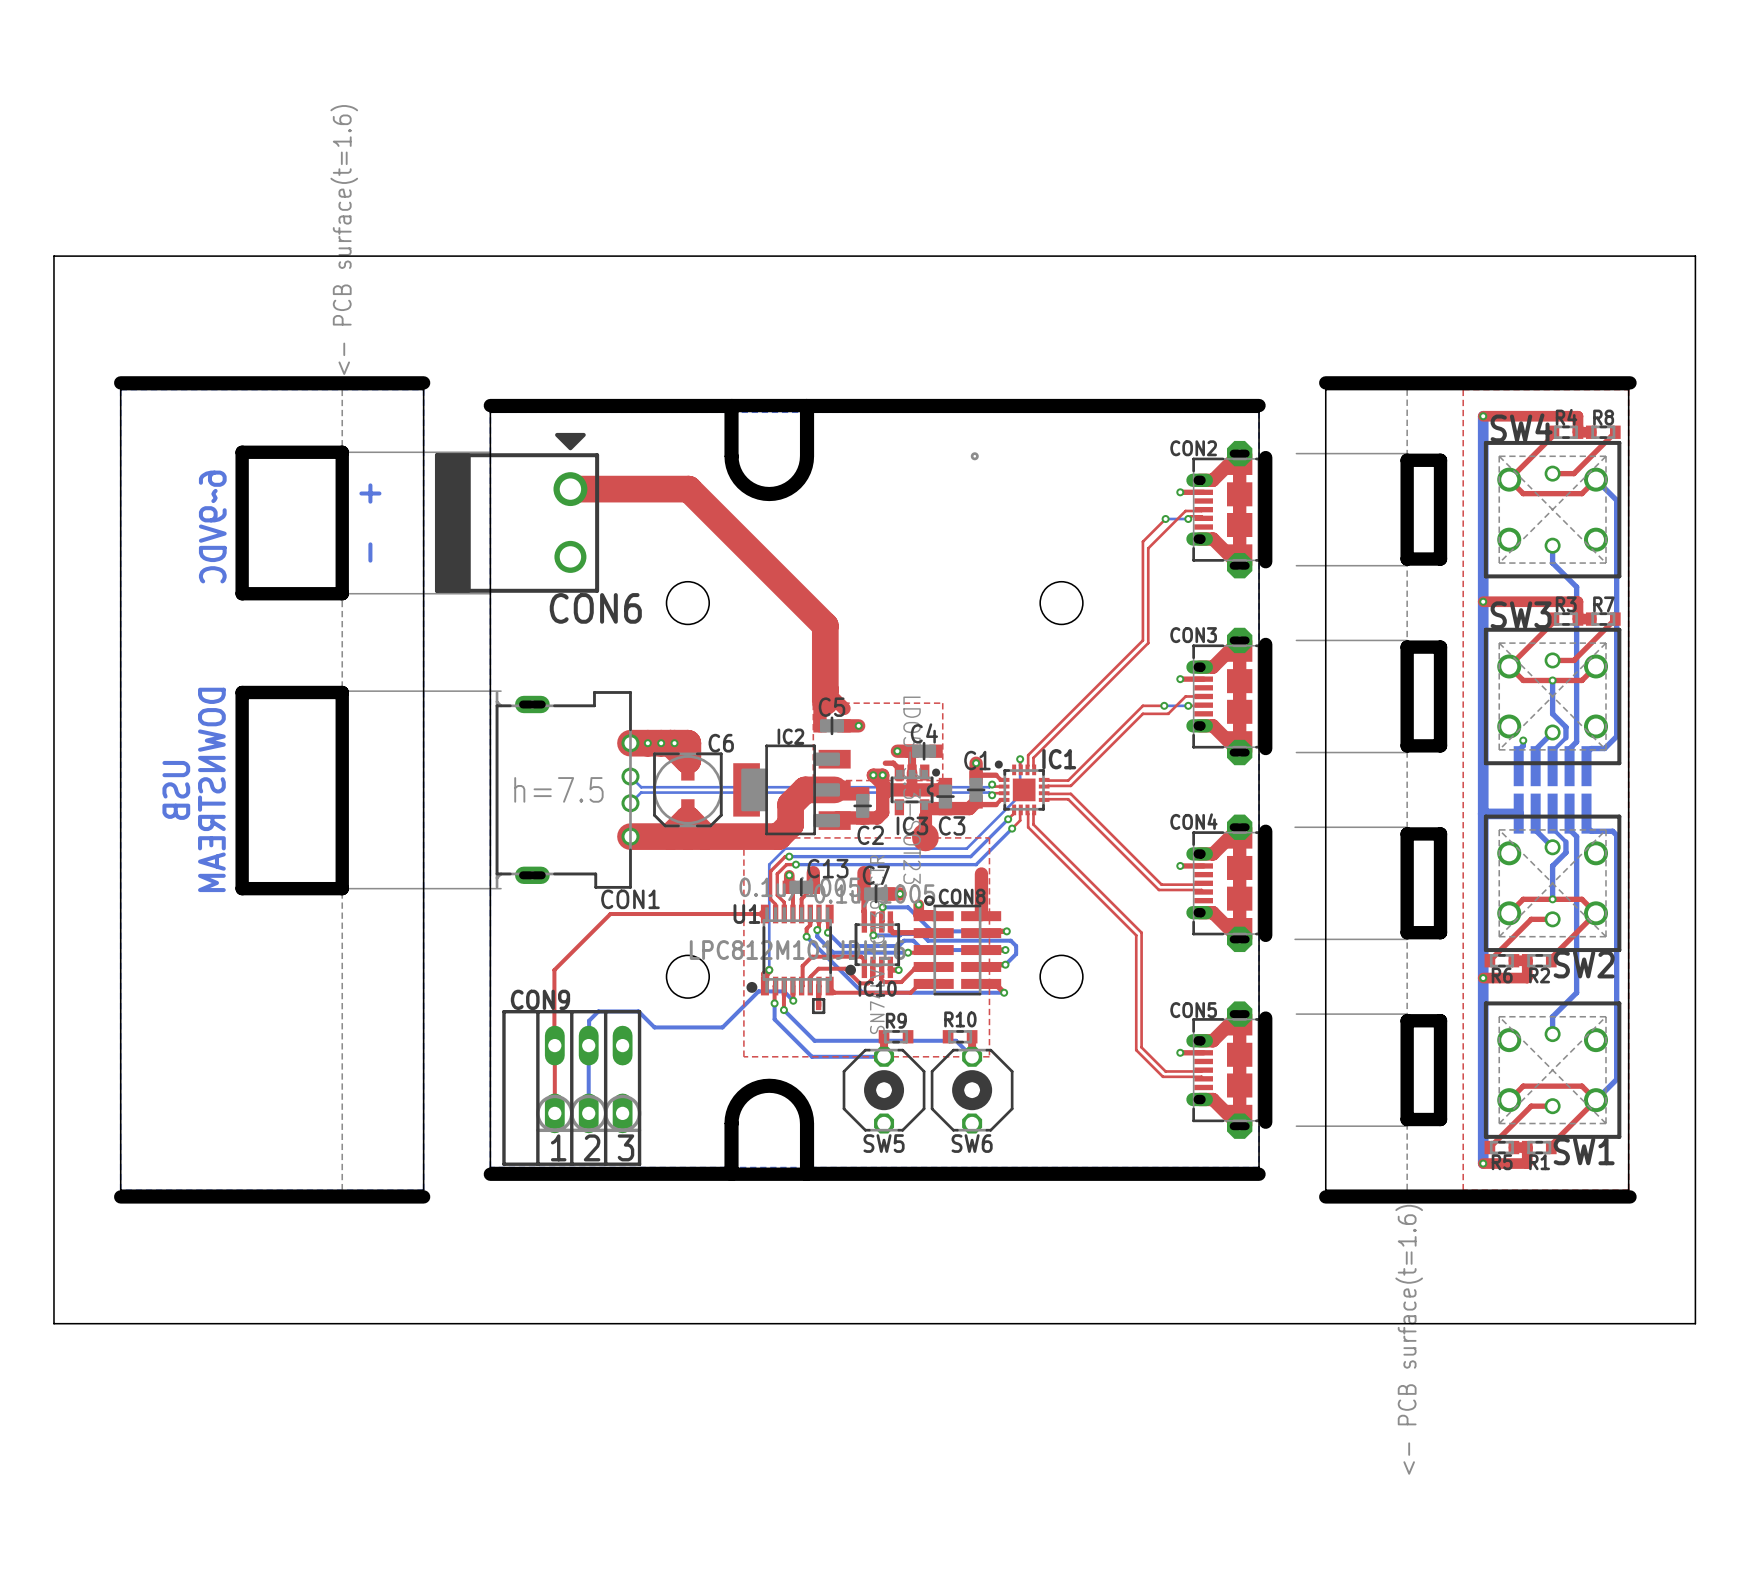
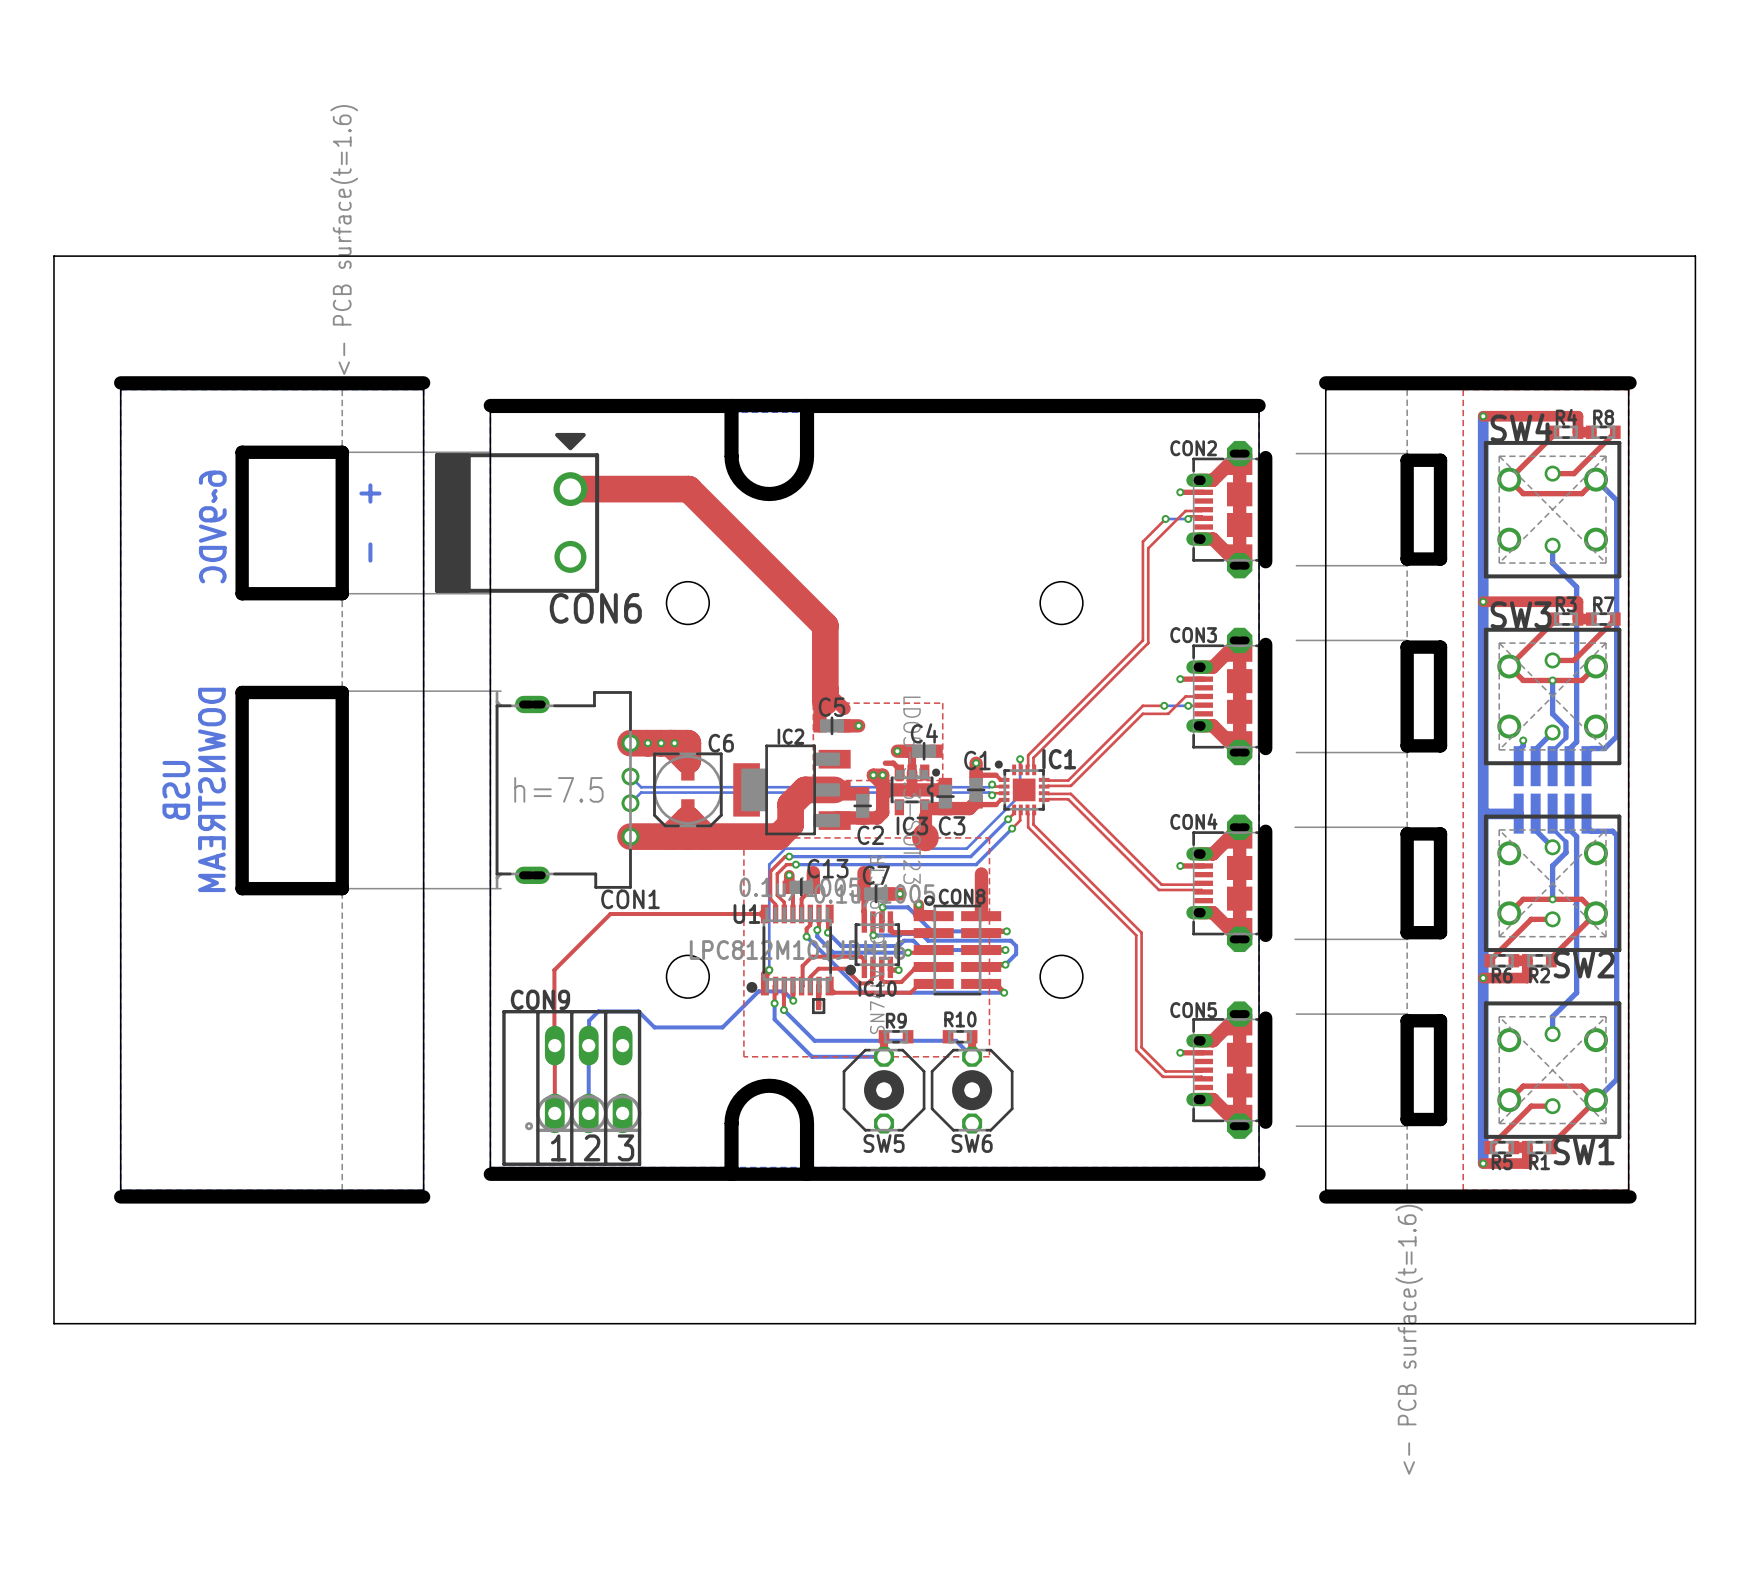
drawing: [970, 452, 979, 461] -> none
drawing: none -> [525, 1122, 534, 1131]

